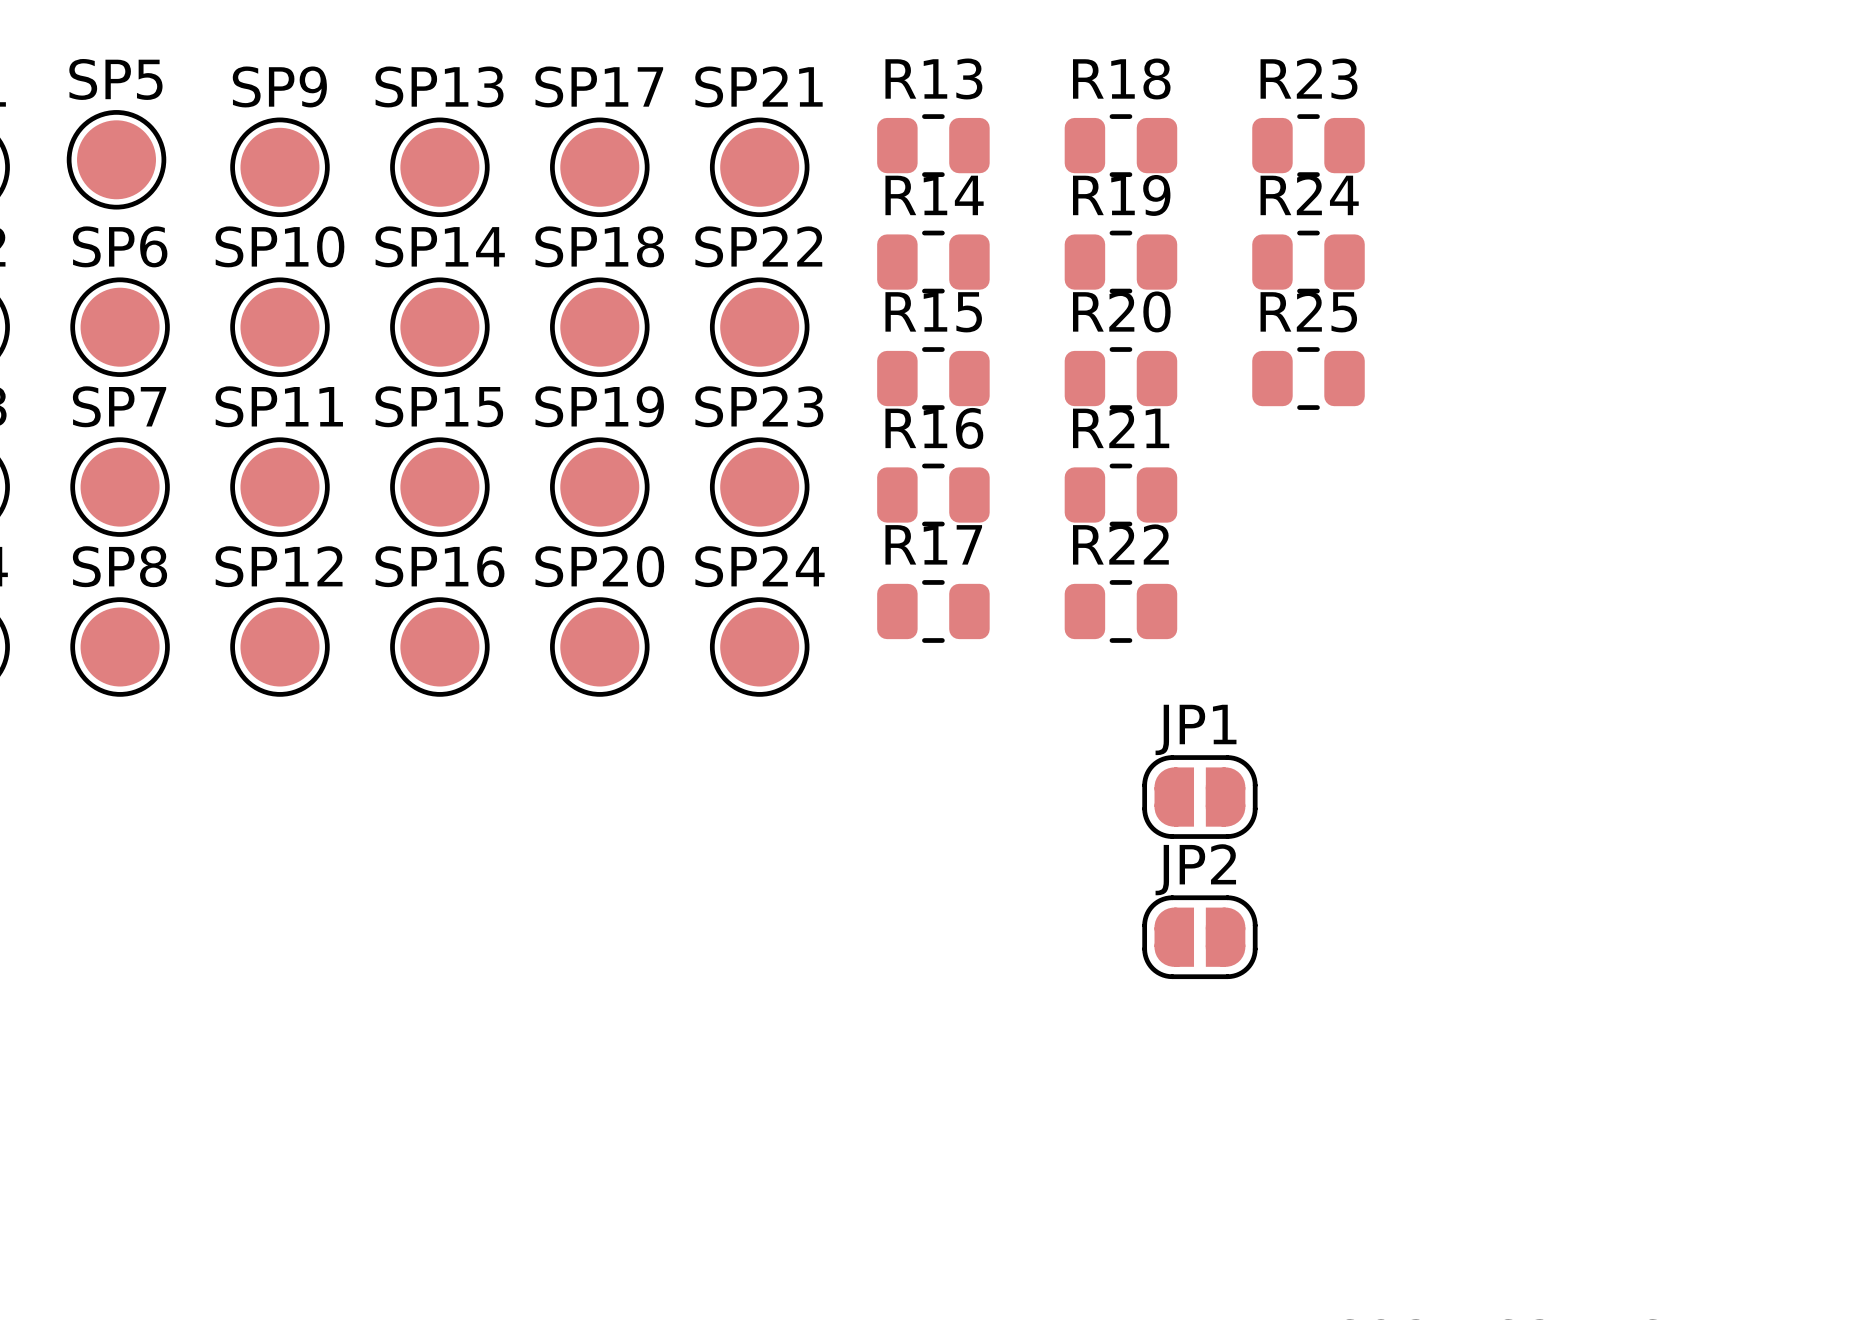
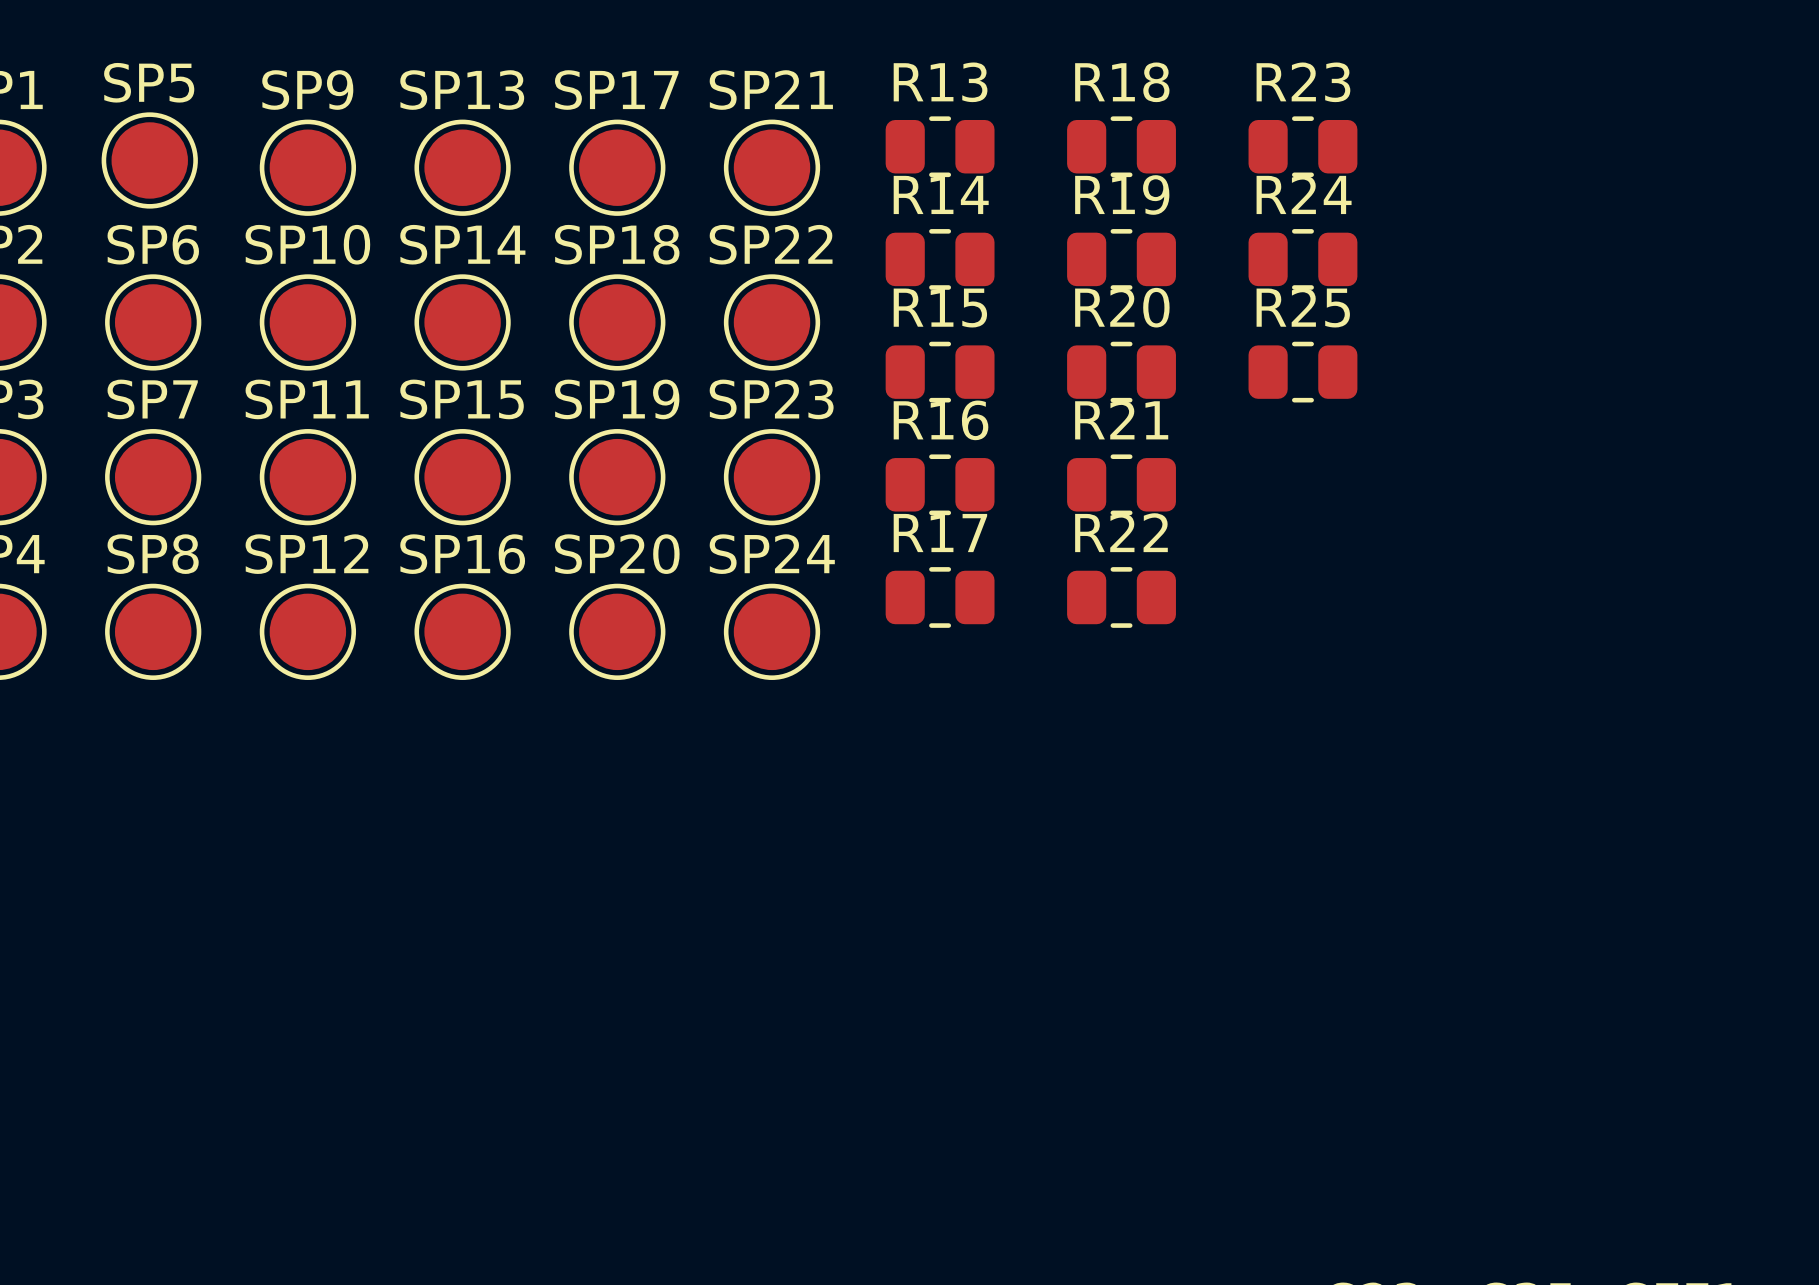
JP1: (1199, 797) -> none
JP2: (1199, 937) -> none

